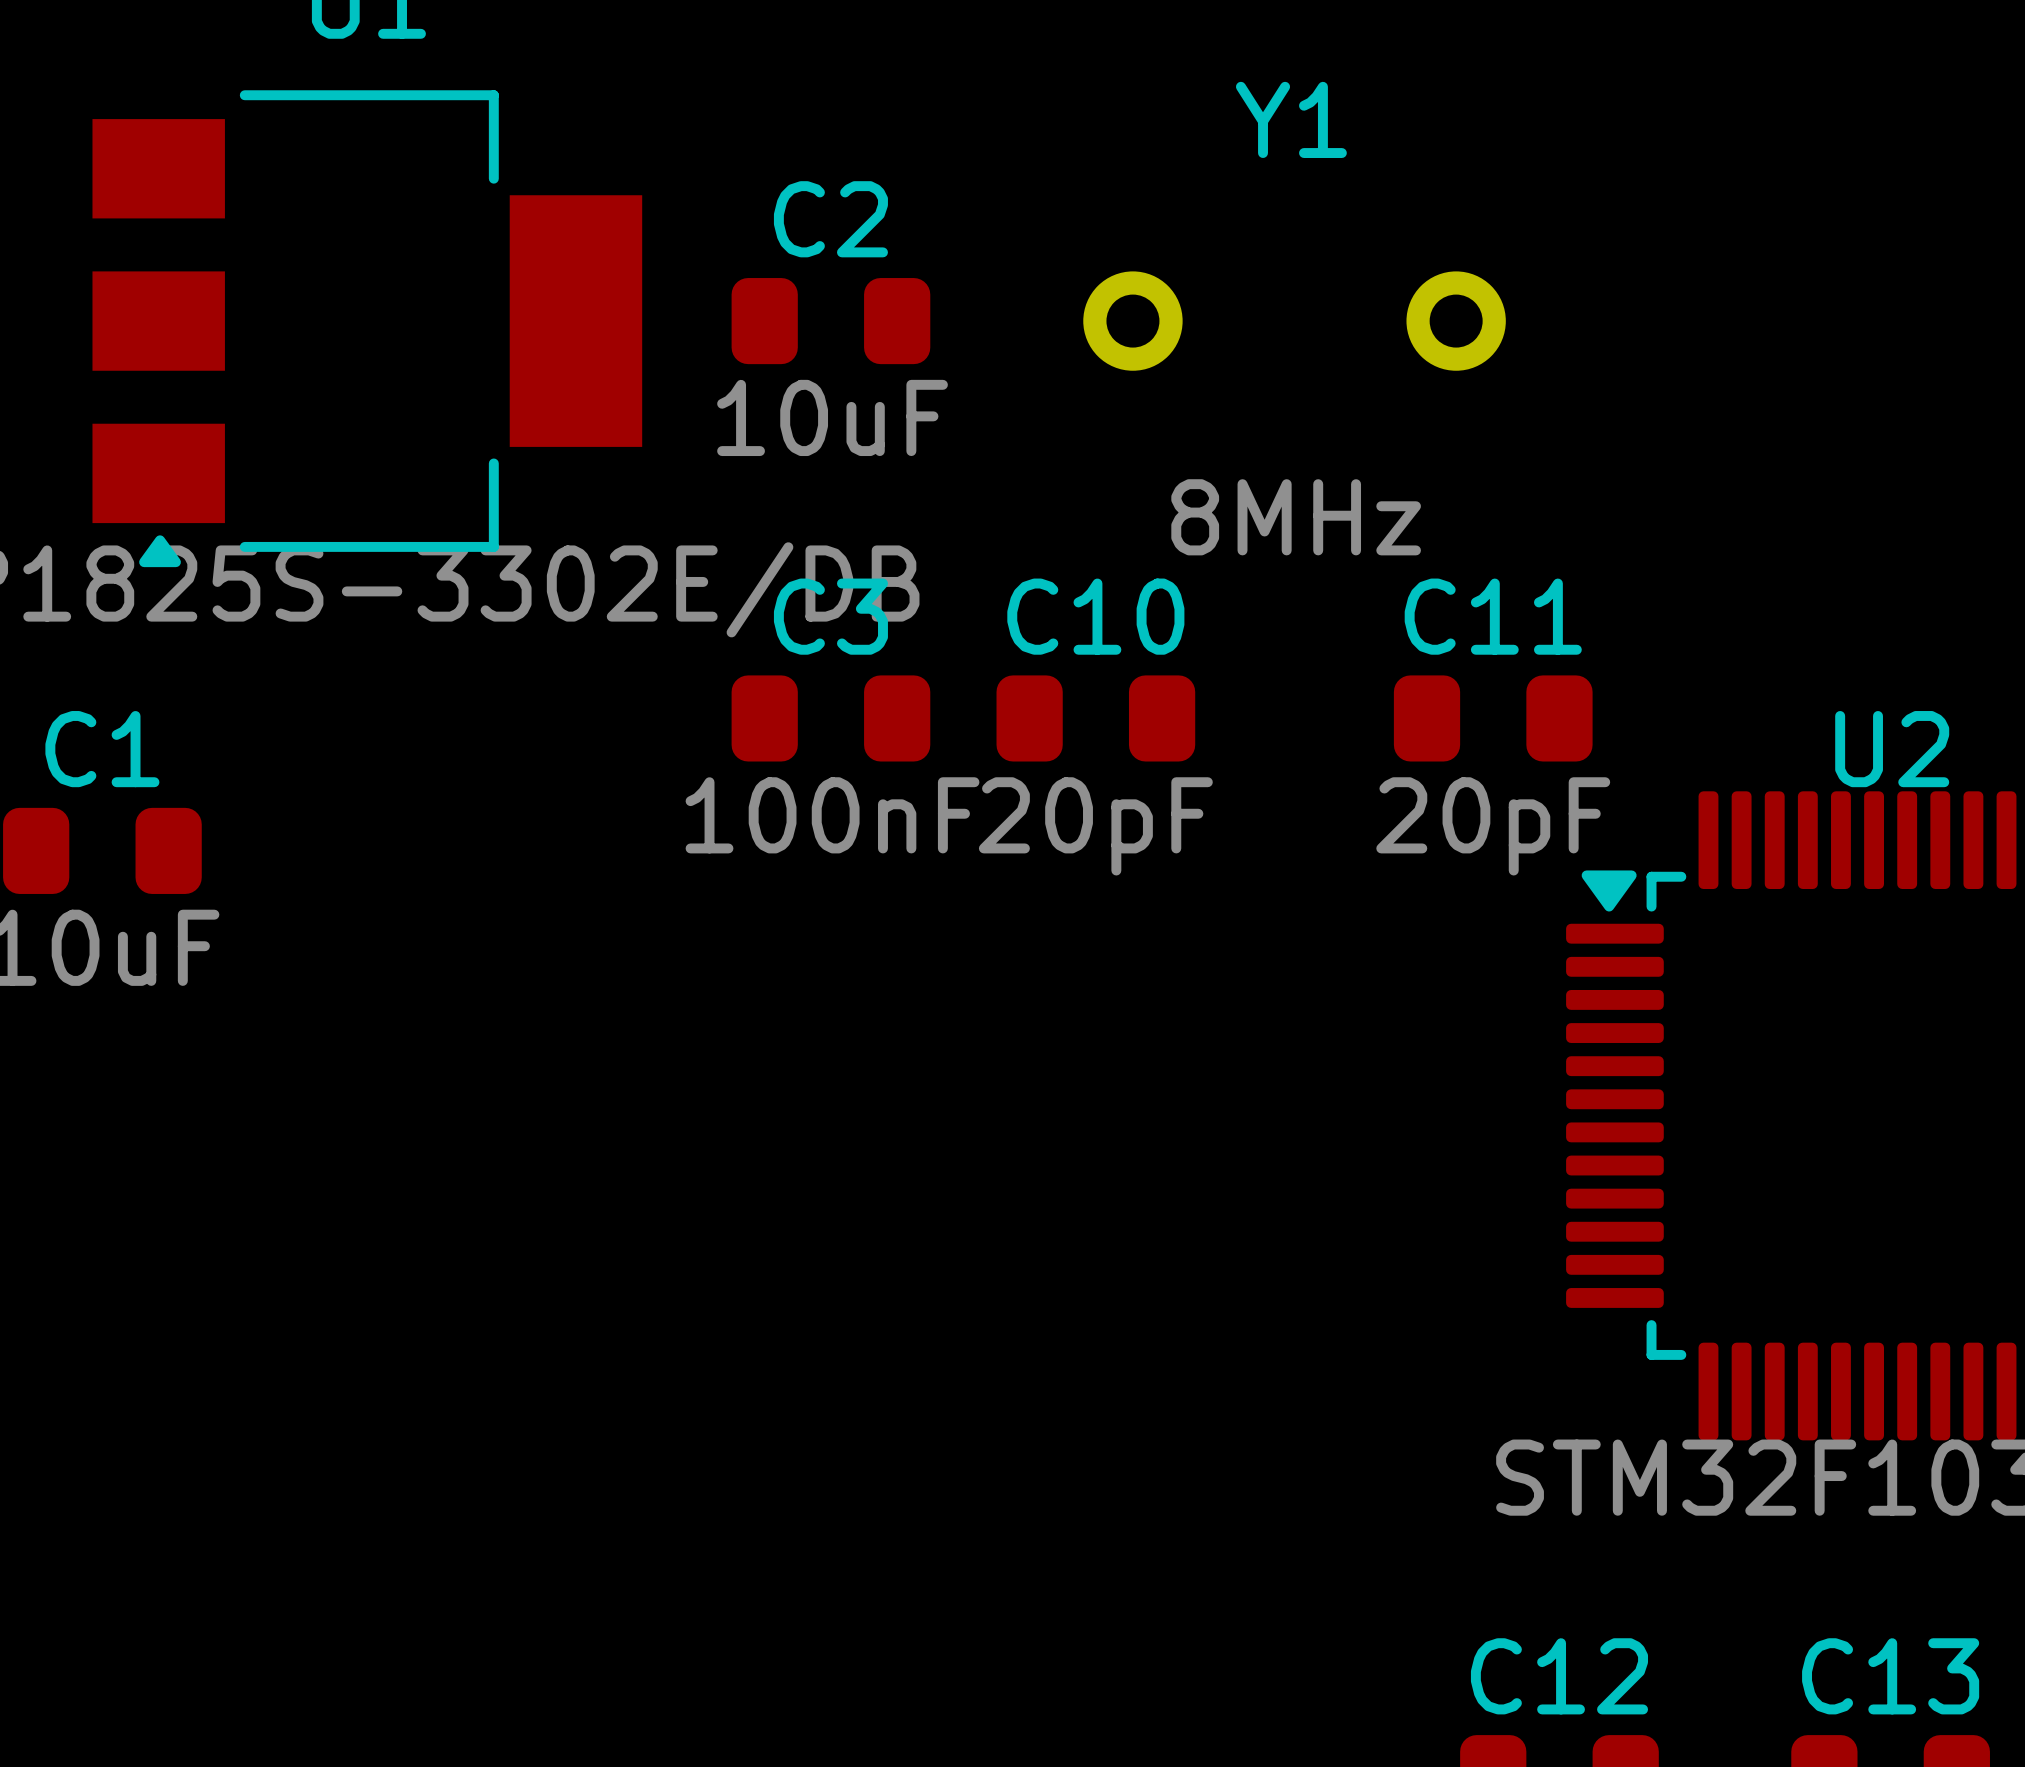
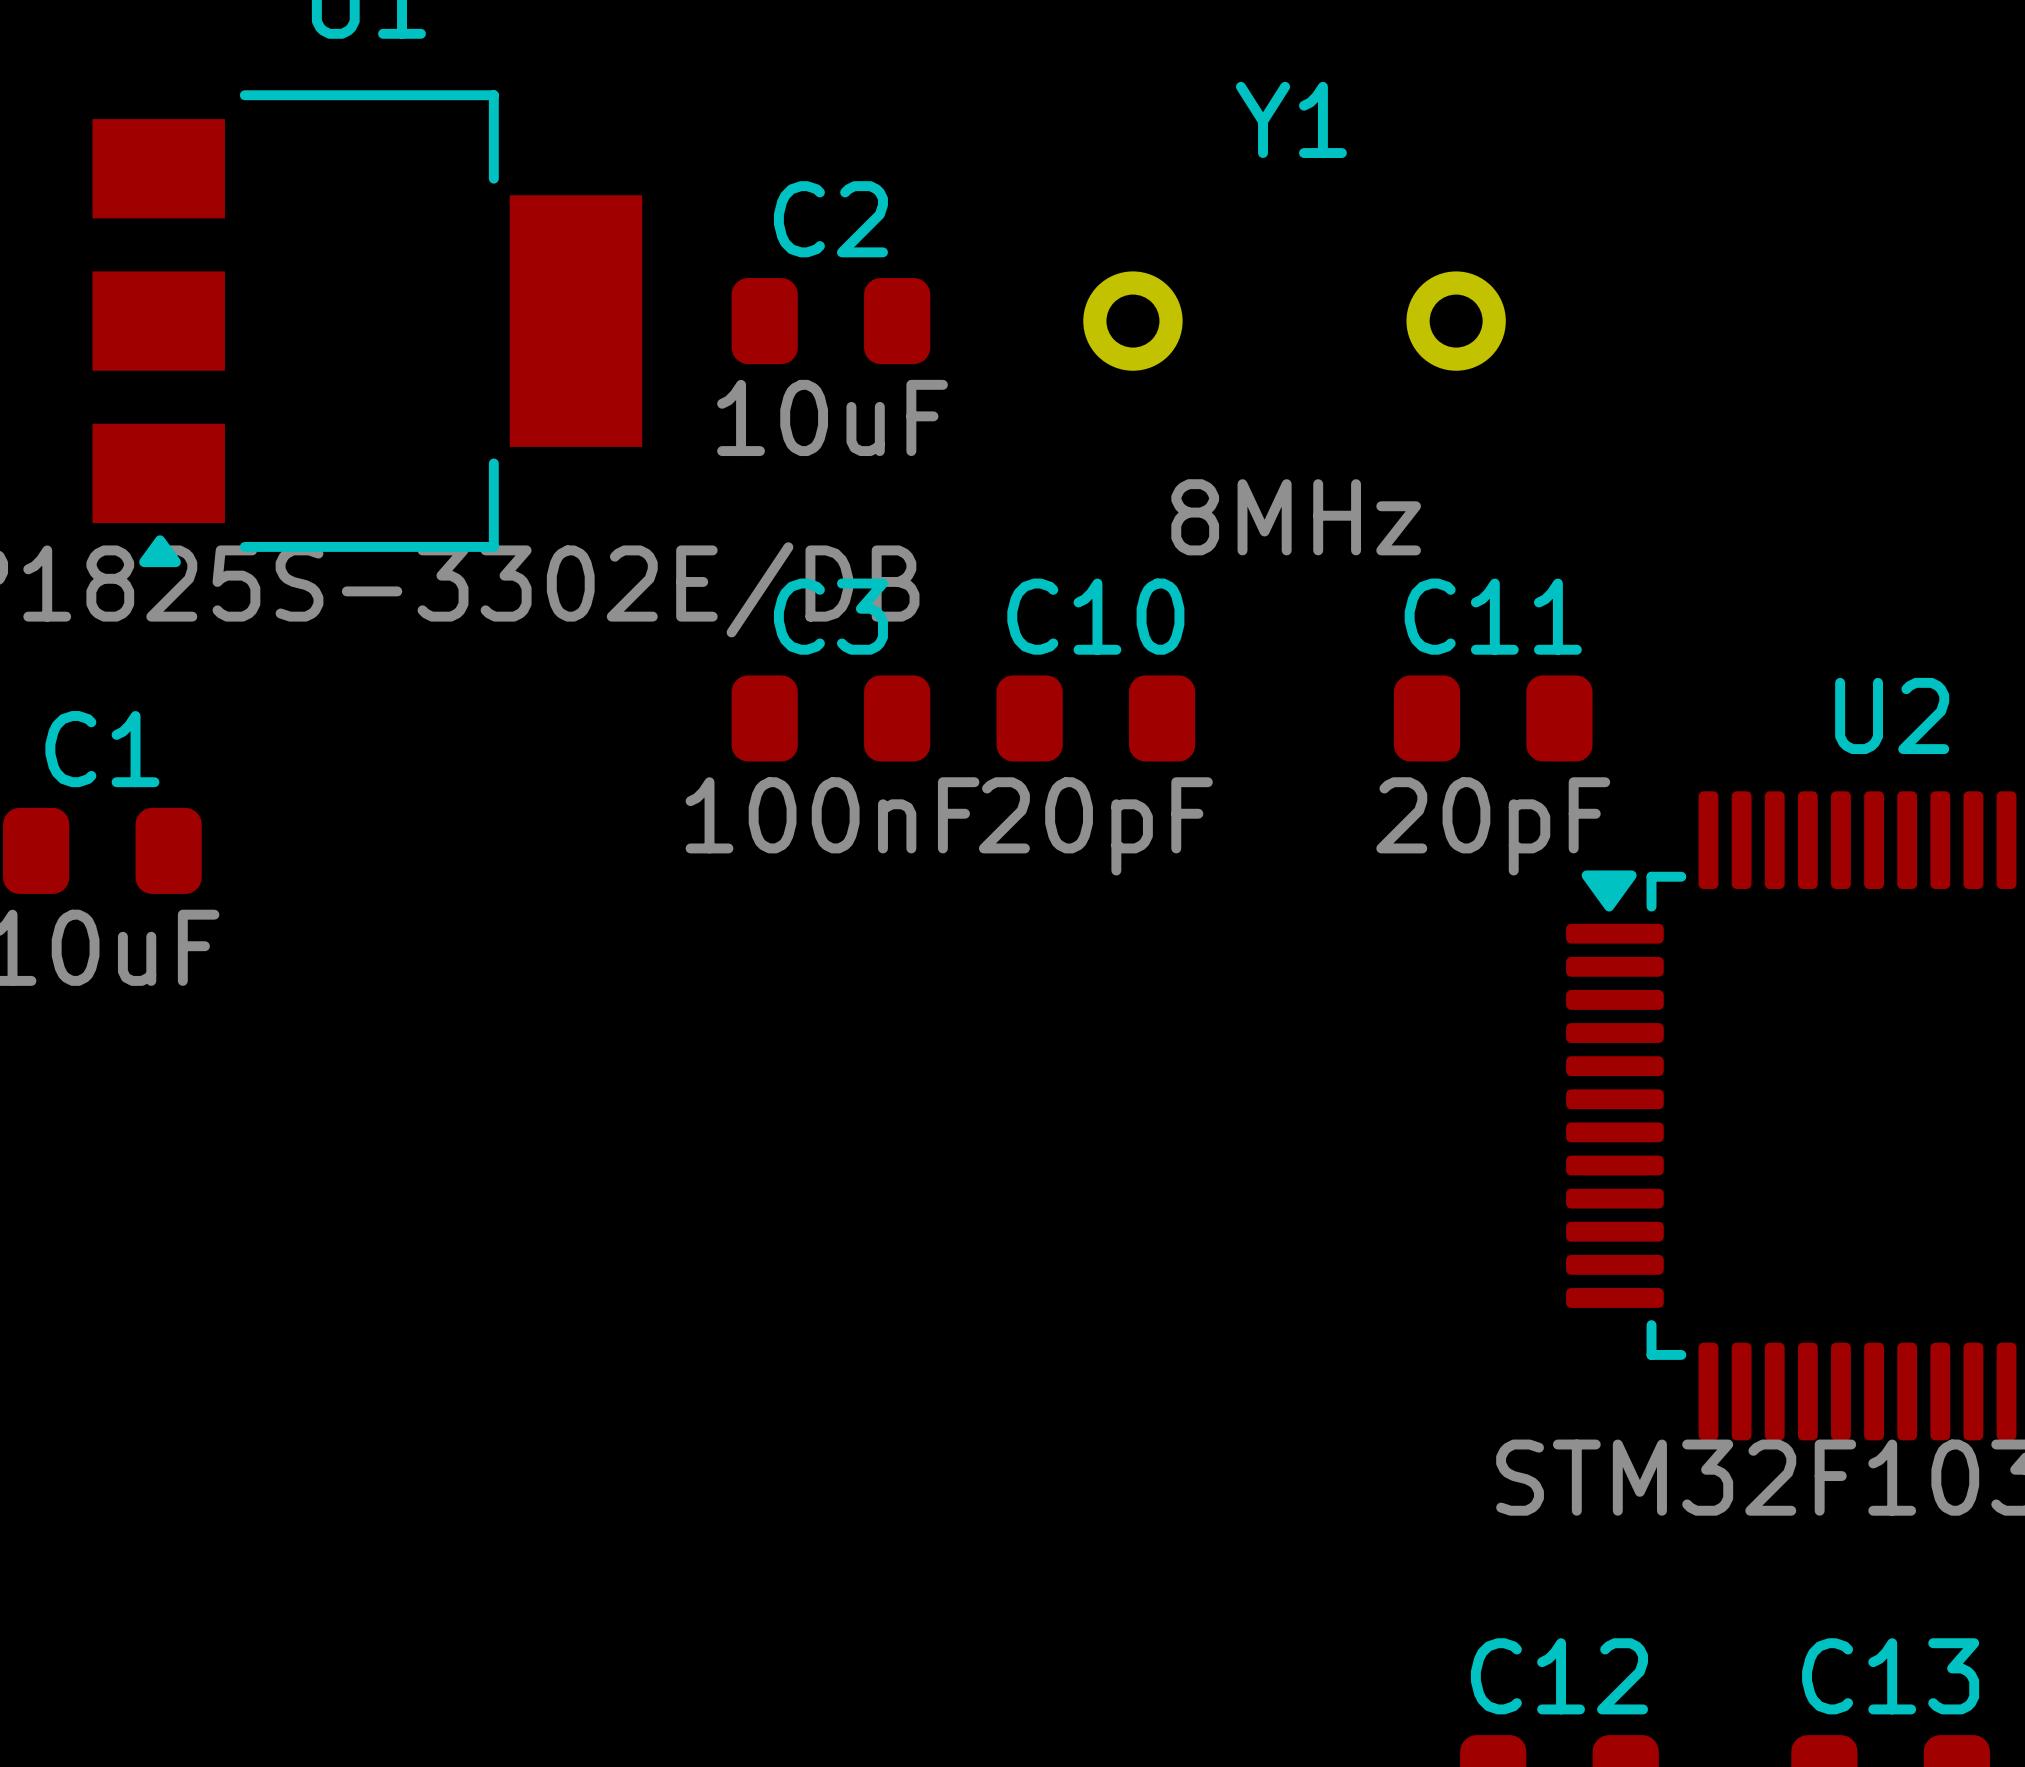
U2 name position: U2 (1892, 749) -> U2 (1892, 715)

